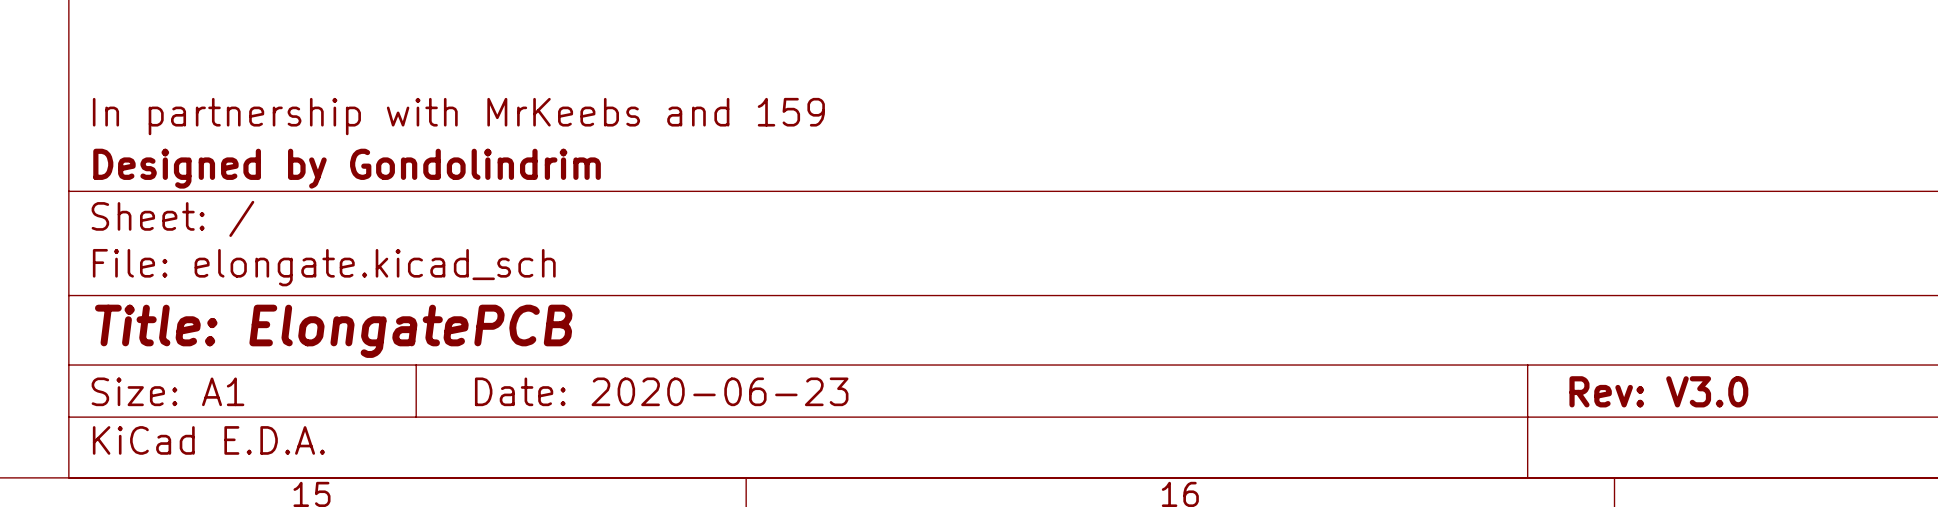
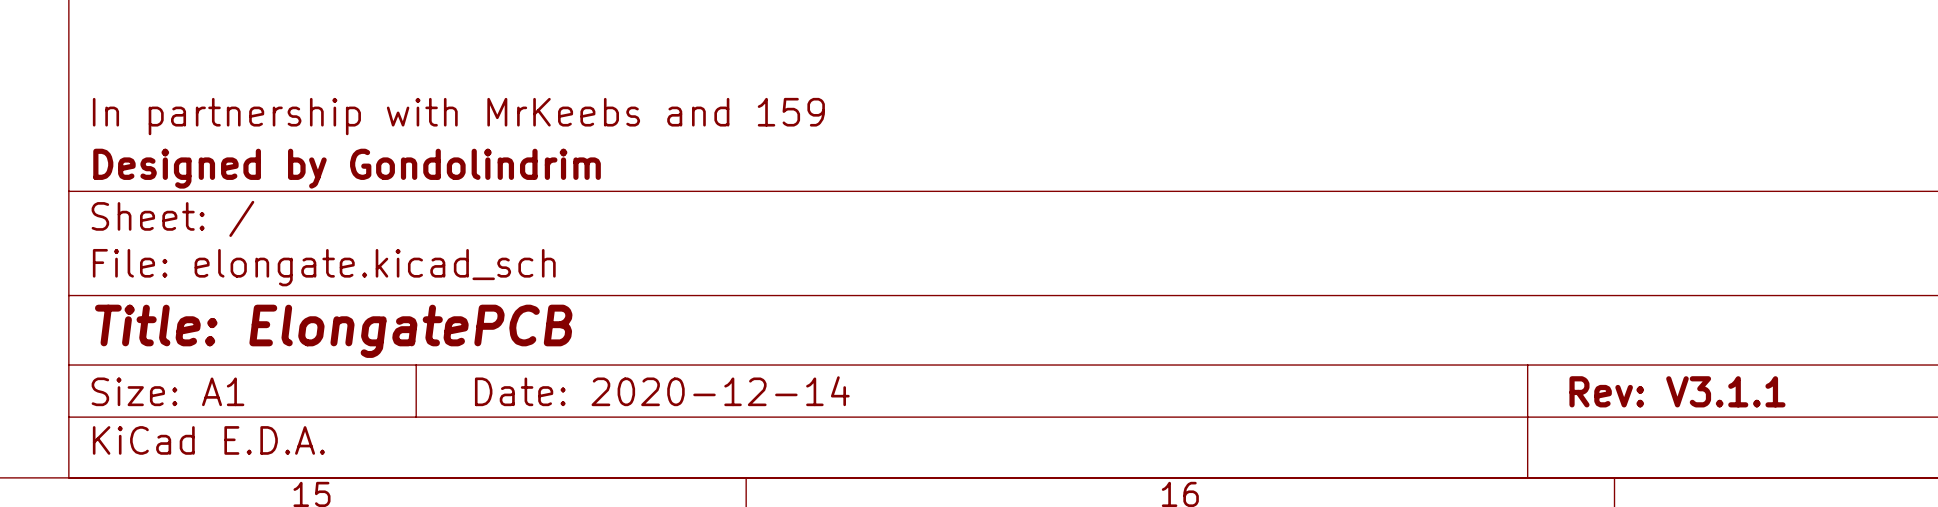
title block: Date: 2020-06-23 (661, 391) -> Date: 2020-12-14 (662, 391)
title block: Rev: V3.0 (1658, 391) -> Rev: V3.1.1 (1677, 391)

